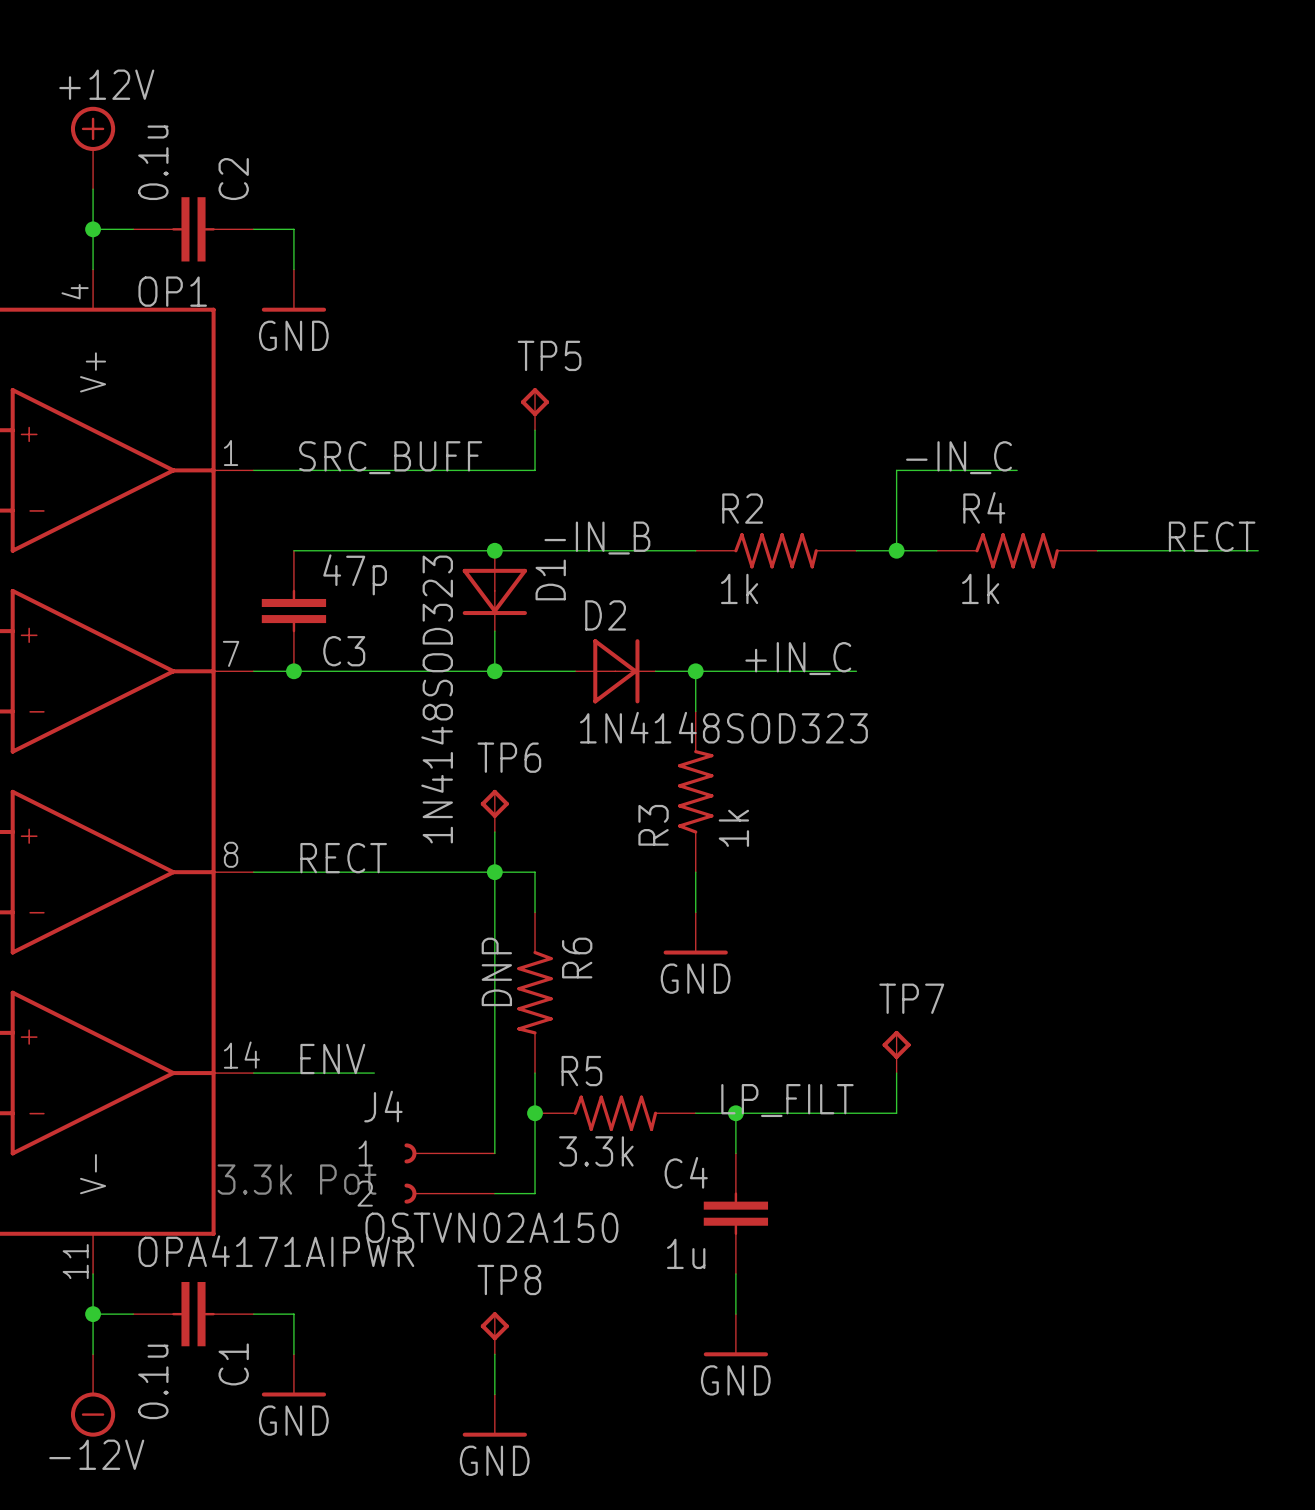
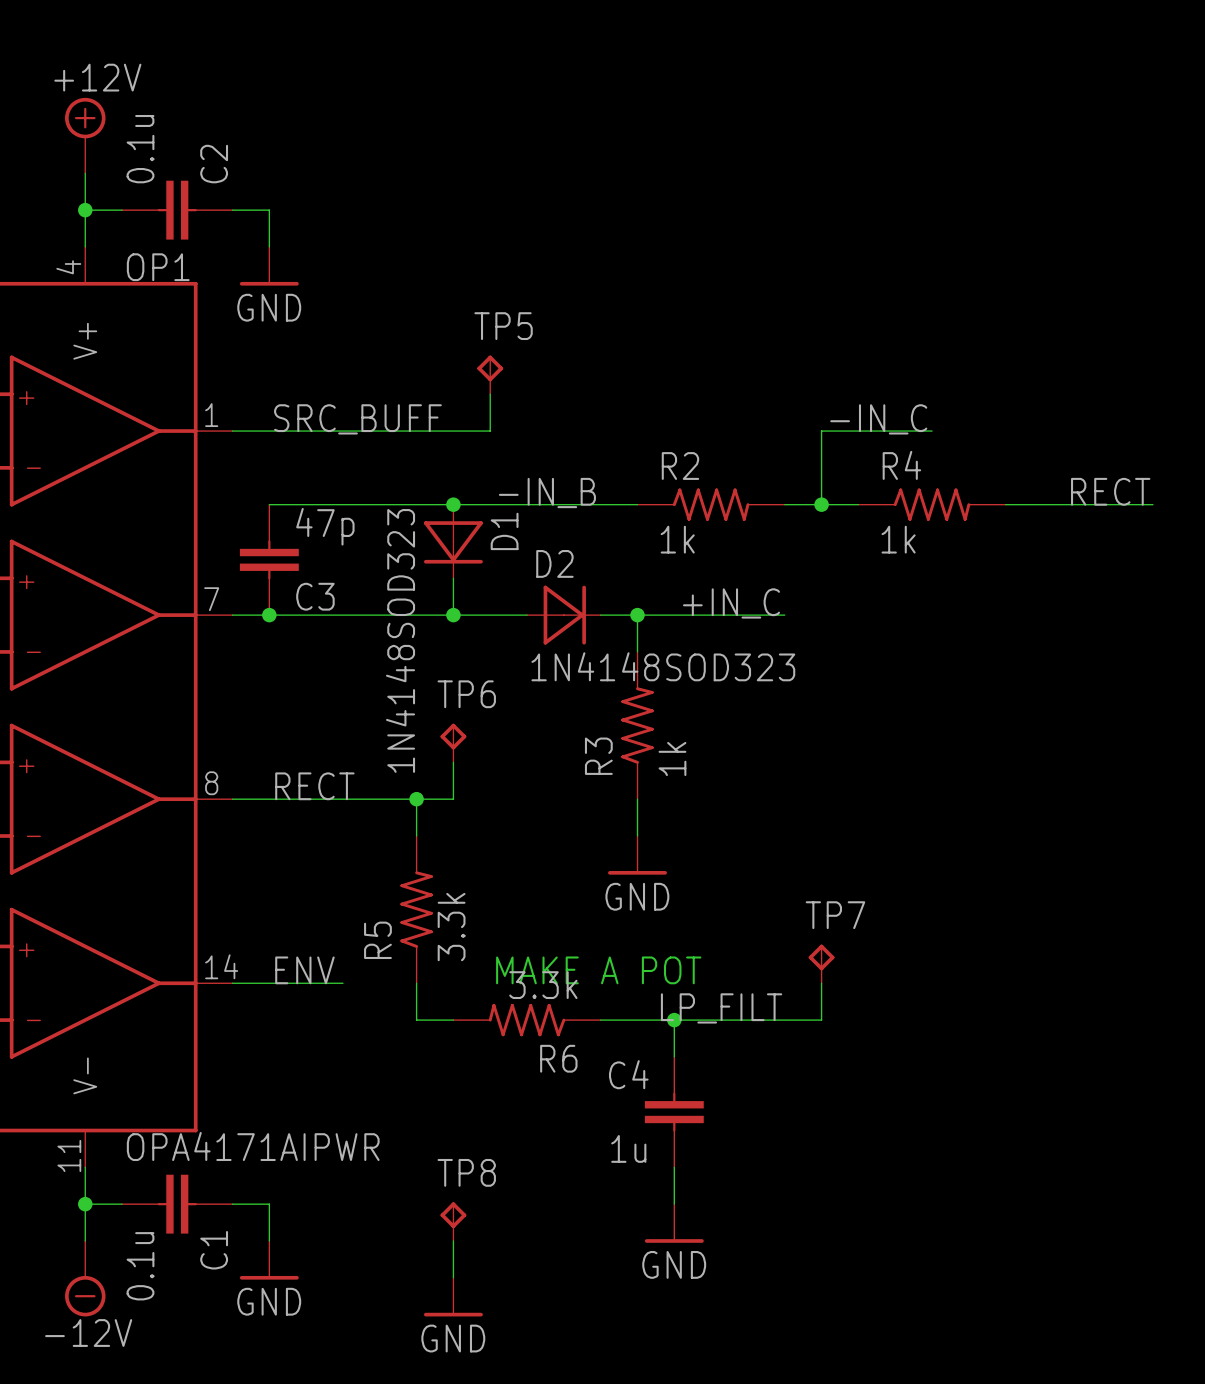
wire: none -> (416, 799) (416, 836)
junction position: (494, 872) -> (416, 799)
wire: (535, 912) (535, 872) (494, 872) (494, 1153) -> none
R6 value: DNP (496, 971) -> 3.3k (543, 985)
R6 rotation: 0° (535, 992) -> 90° clockwise (527, 1020)
R6 position: (535, 992) -> (527, 1020)
text: none -> MAKE A POT (598, 970)
wire: none -> (416, 983) (416, 1020) (453, 1020)
wire: (535, 1073) (535, 1193) (494, 1193) -> none
junction: (535, 1113) -> none
R5 rotation: 0° (615, 1113) -> 90° counterclockwise (416, 909)
R5 position: (615, 1113) -> (416, 909)
J4: OSTVN02A150 (449, 1173) -> none
text: 3.3k Pot (297, 1179) -> none

